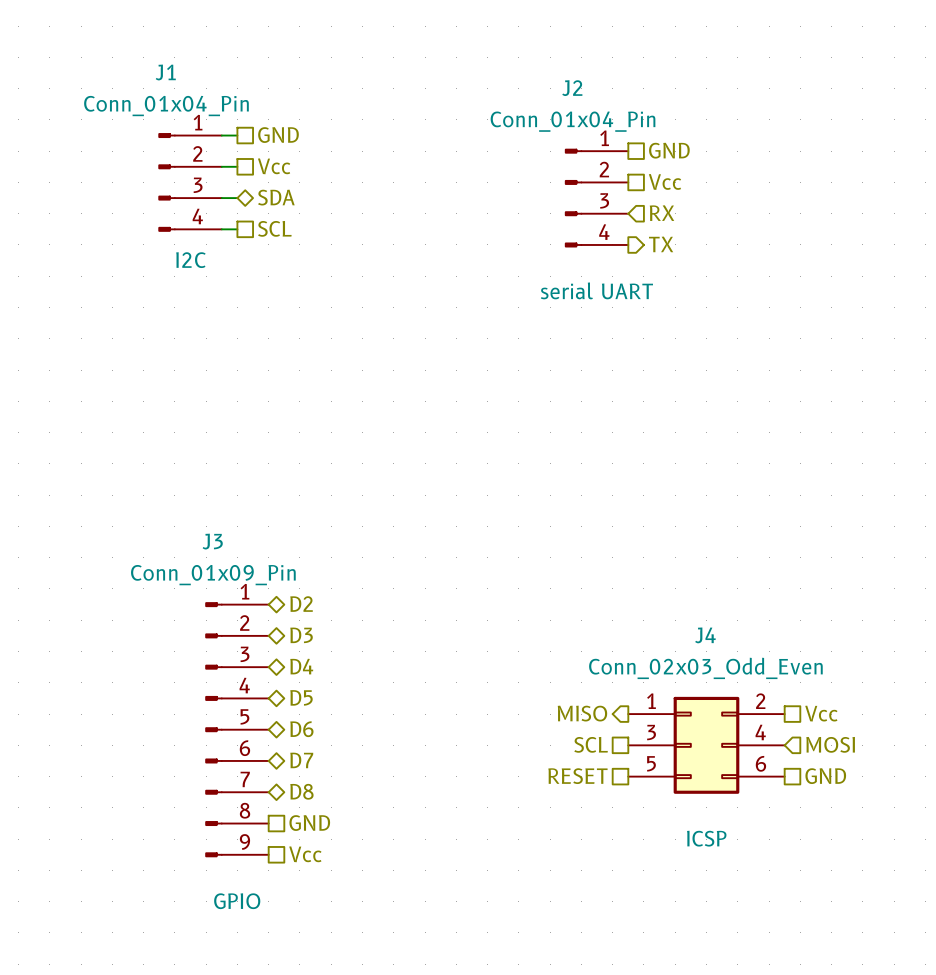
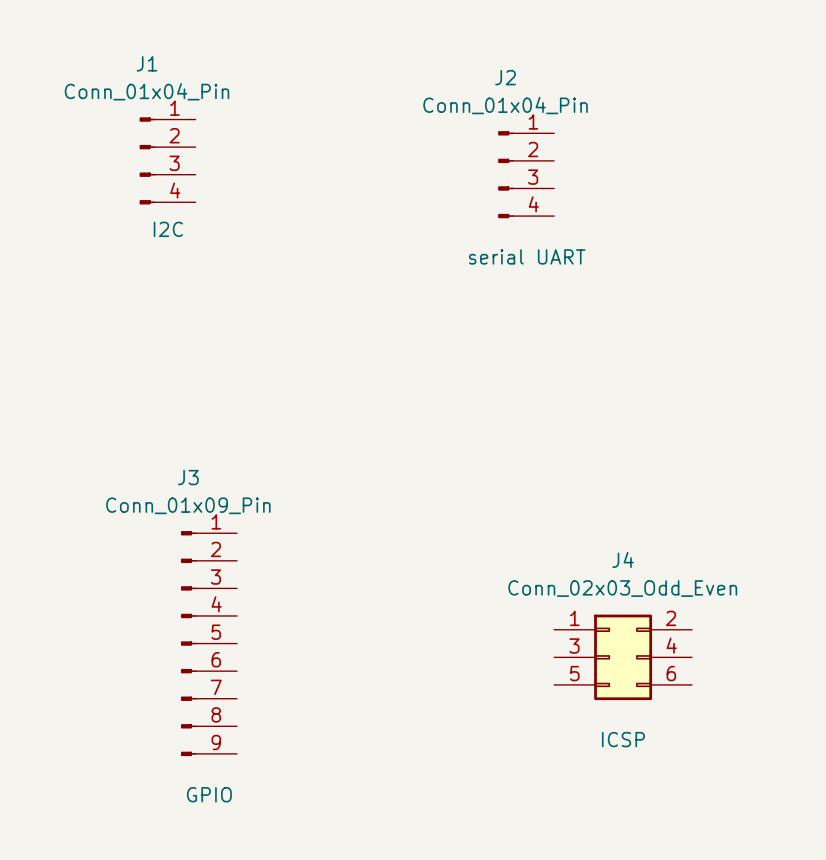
wire: (221, 135) (237, 135) -> none
hierarchical label: GND (278, 135) -> none
hierarchical label: GND (669, 150) -> none
wire: (221, 166) (237, 166) -> none
hierarchical label: Vcc (274, 166) -> none
hierarchical label: Vcc (665, 181) -> none
hierarchical label: SDA (276, 197) -> none
wire: (221, 198) (237, 198) -> none
hierarchical label: RX (662, 213) -> none
hierarchical label: SCL (274, 228) -> none
wire: (221, 229) (237, 229) -> none
hierarchical label: TX (661, 244) -> none
hierarchical label: D2 (301, 604) -> none
hierarchical label: D3 (301, 635) -> none
hierarchical label: D4 (301, 666) -> none
hierarchical label: D5 (301, 697) -> none
hierarchical label: MISO (582, 713) -> none
hierarchical label: Vcc (821, 713) -> none
hierarchical label: D6 (301, 729) -> none
hierarchical label: SCL (591, 744) -> none
hierarchical label: MOSI (830, 744) -> none
hierarchical label: D7 (301, 760) -> none
hierarchical label: RESET (577, 776) -> none
hierarchical label: GND (825, 776) -> none
hierarchical label: D8 (301, 791) -> none
hierarchical label: GND (309, 823) -> none
hierarchical label: Vcc (305, 854) -> none

